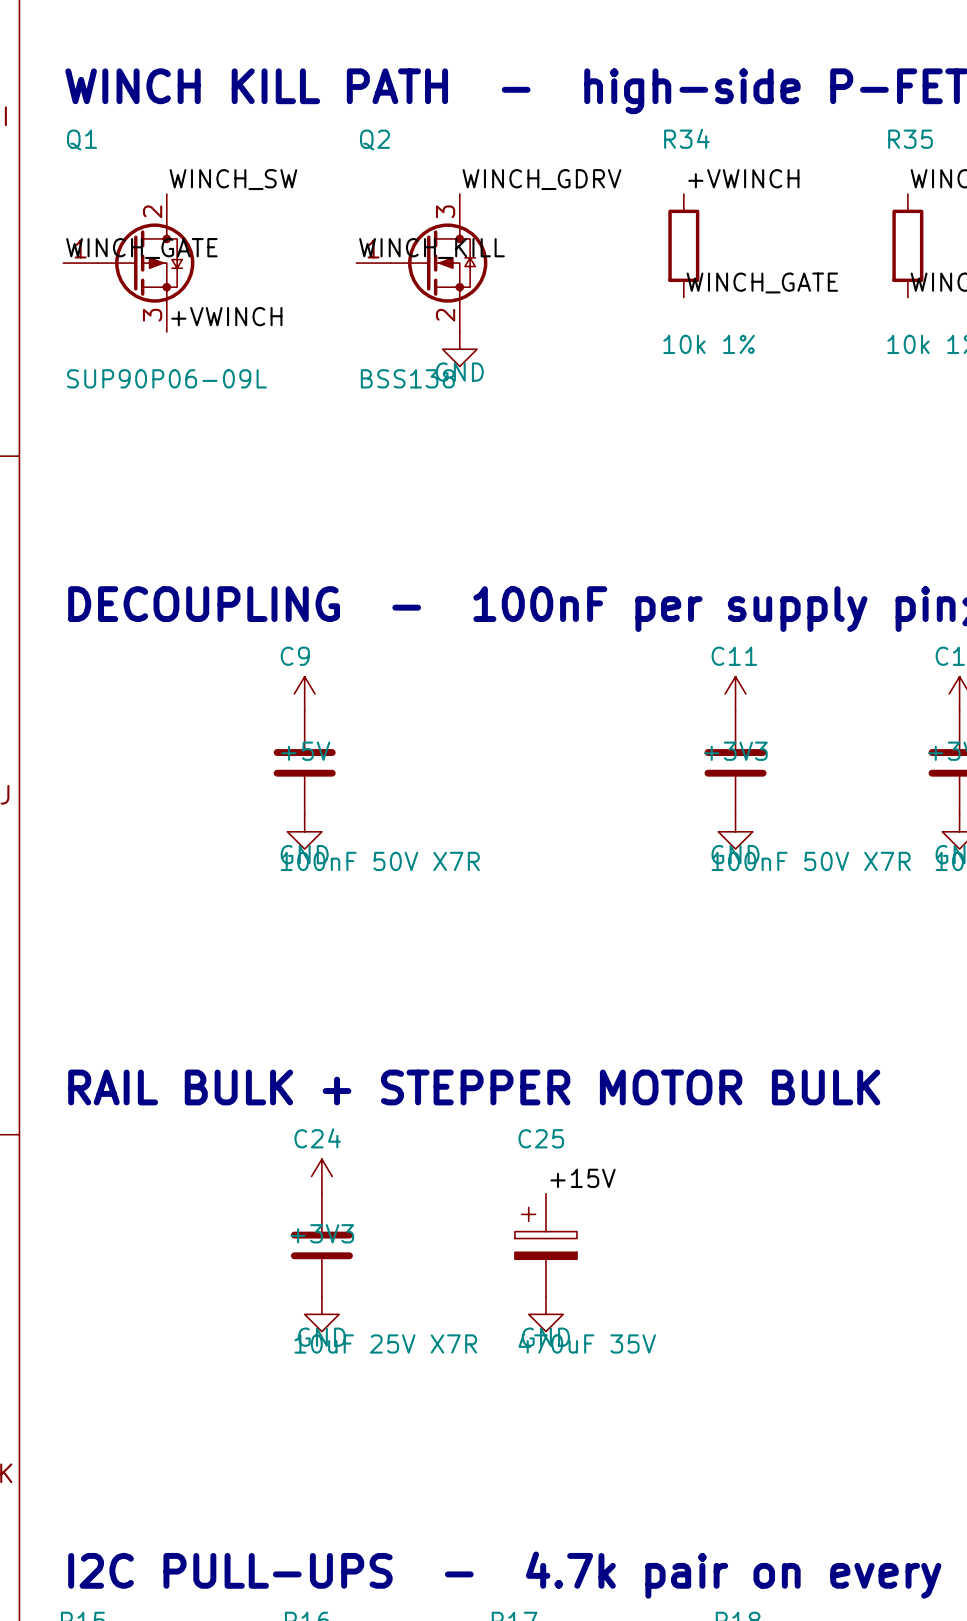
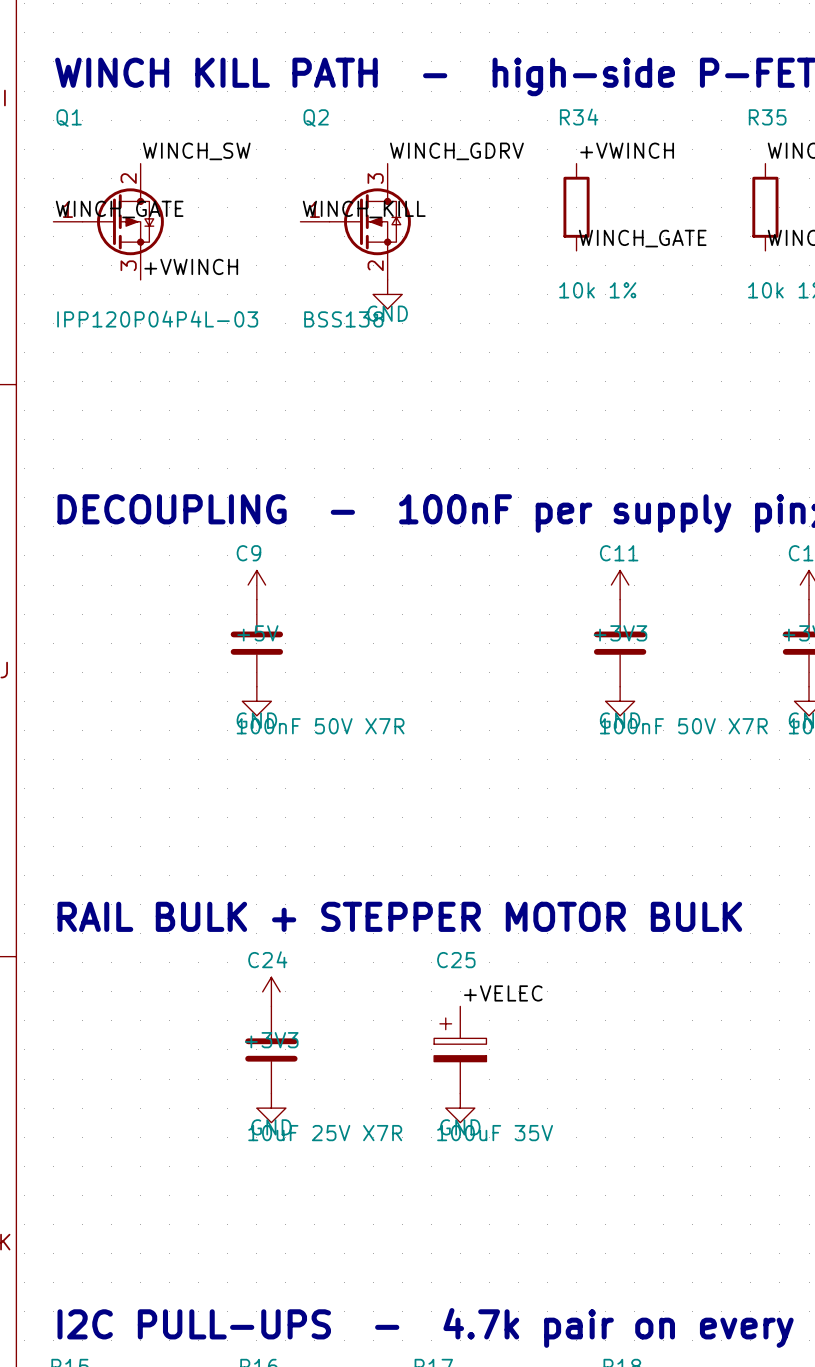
Q1 value: SUP90P06-09L (166, 378) -> IPP120P04P4L-03 (157, 319)
label: +15V (583, 1178) -> +VELEC (503, 993)
C25 value: 470uF 35V (587, 1343) -> 100uF 35V (495, 1133)

